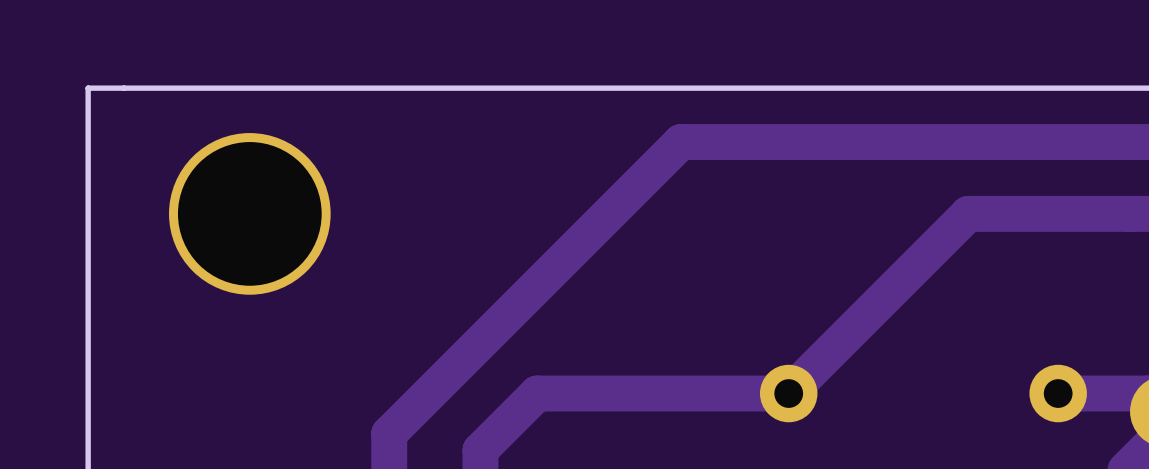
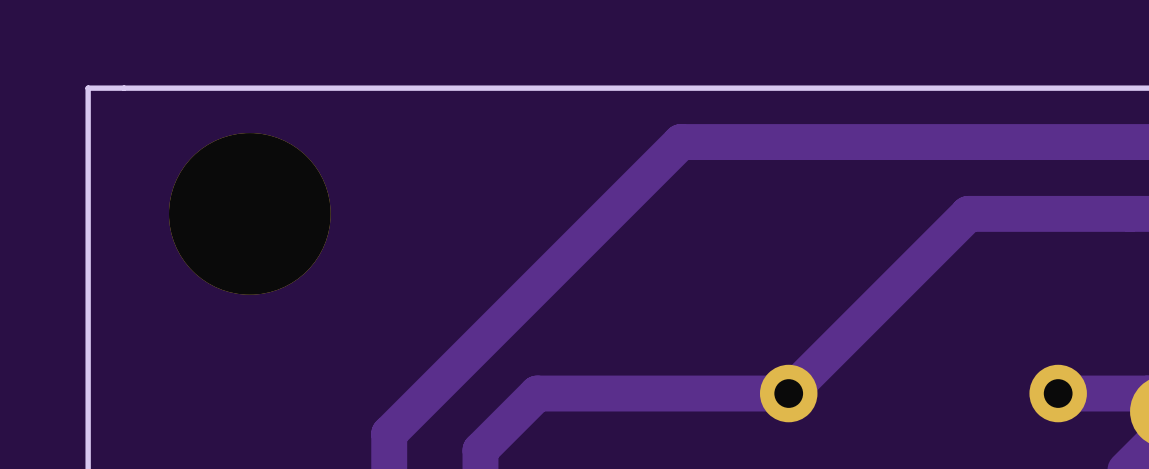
part footprint: [168, 133, 331, 295] -> [168, 133, 331, 295]

